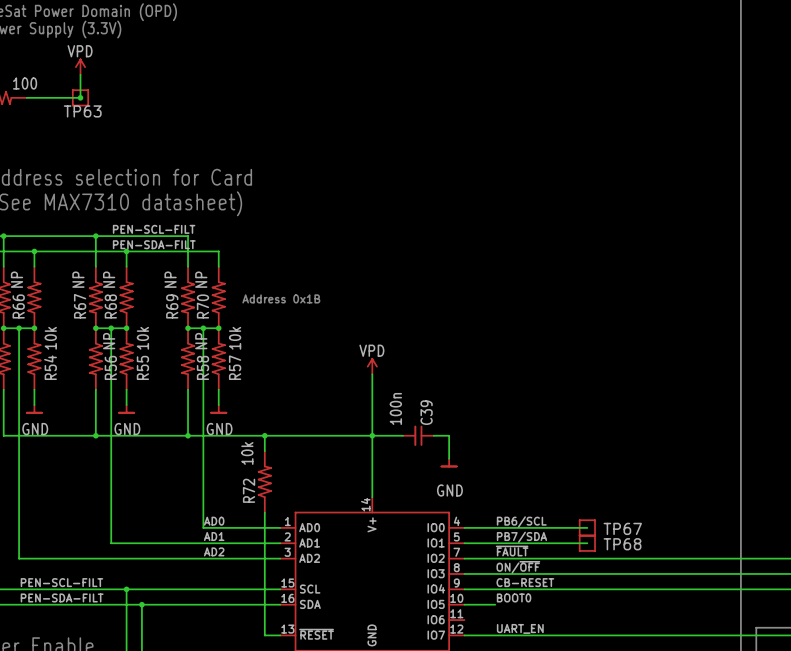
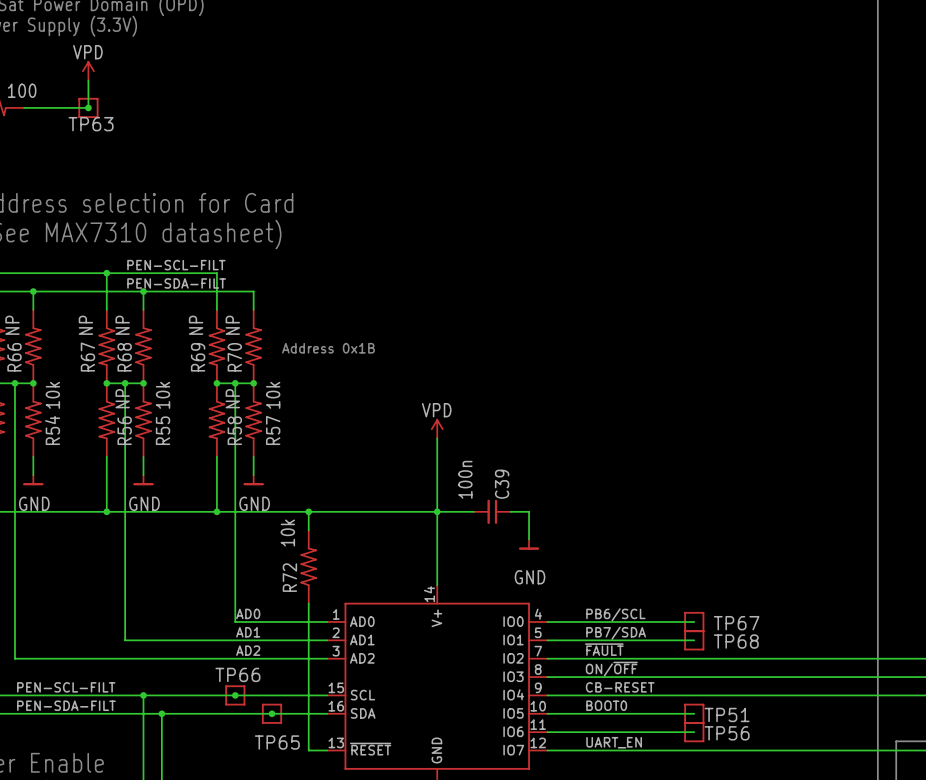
junction: none -> (235, 695)
TP66: none -> (235, 695)
junction: none -> (272, 713)
TP65: none -> (272, 713)
wire: none -> (584, 713) (694, 713)
TP51: none -> (694, 713)
wire: none -> (547, 732) (694, 732)
TP56: none -> (694, 732)

